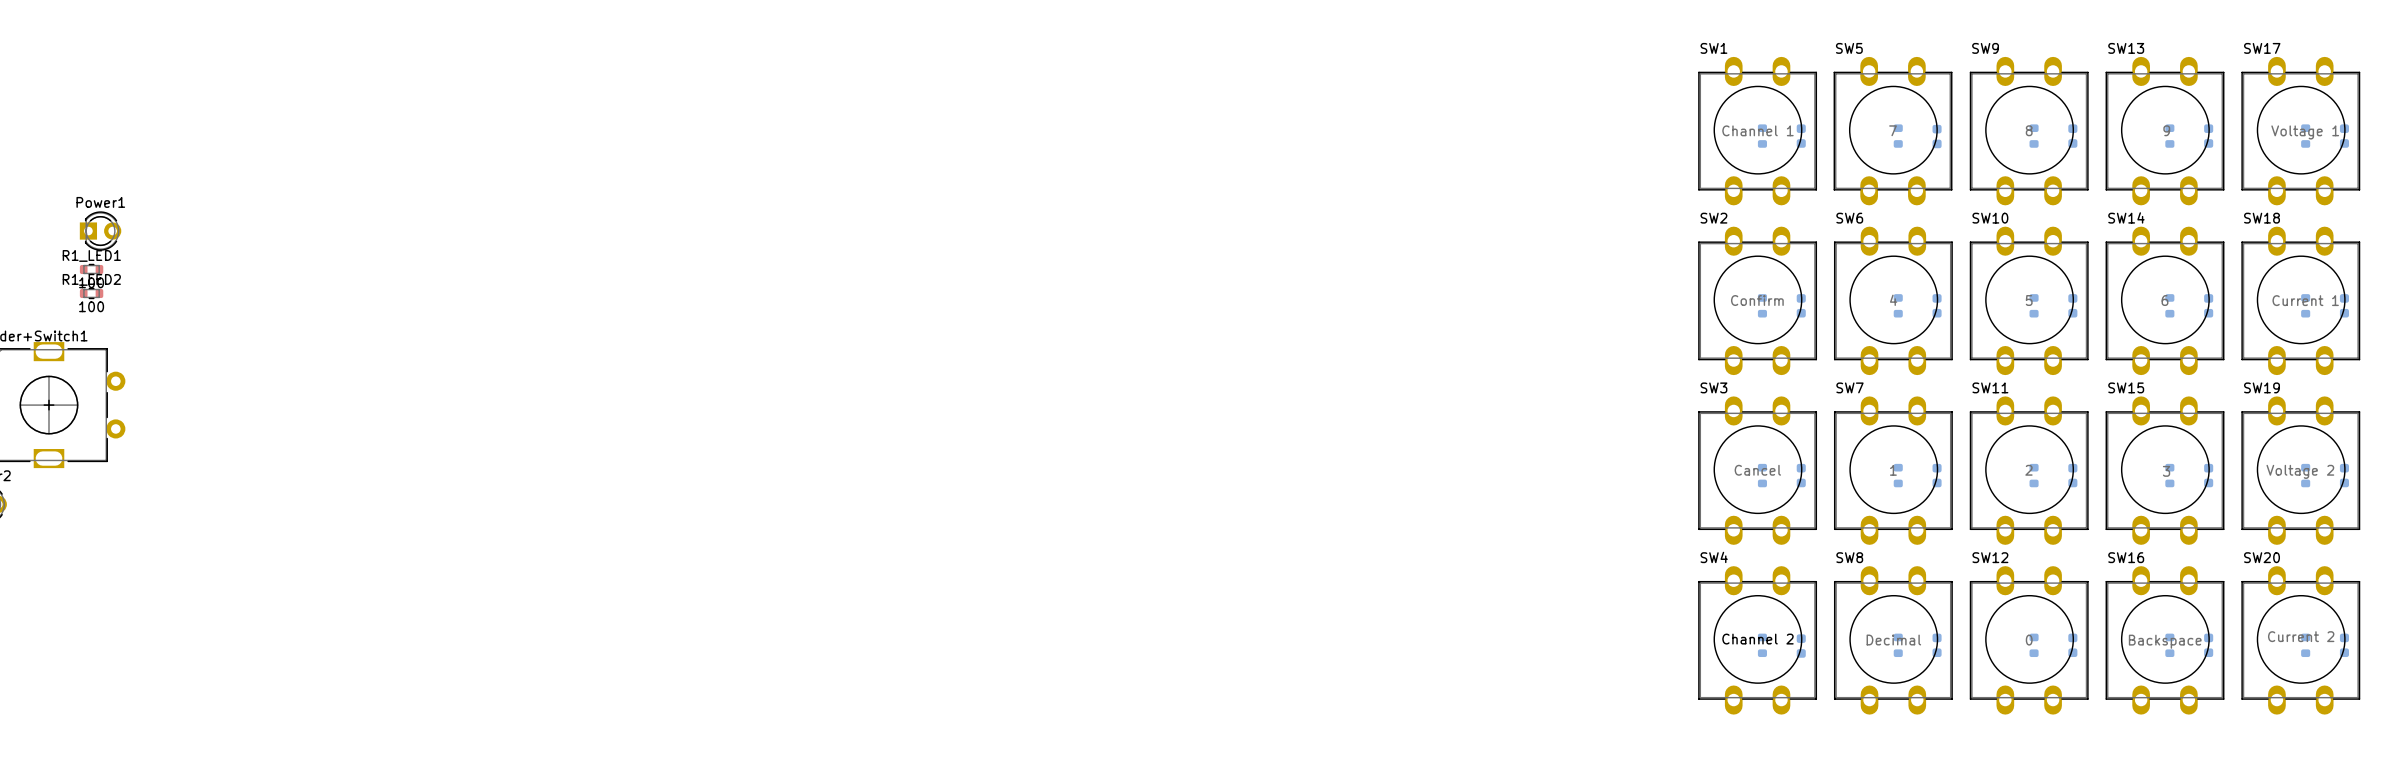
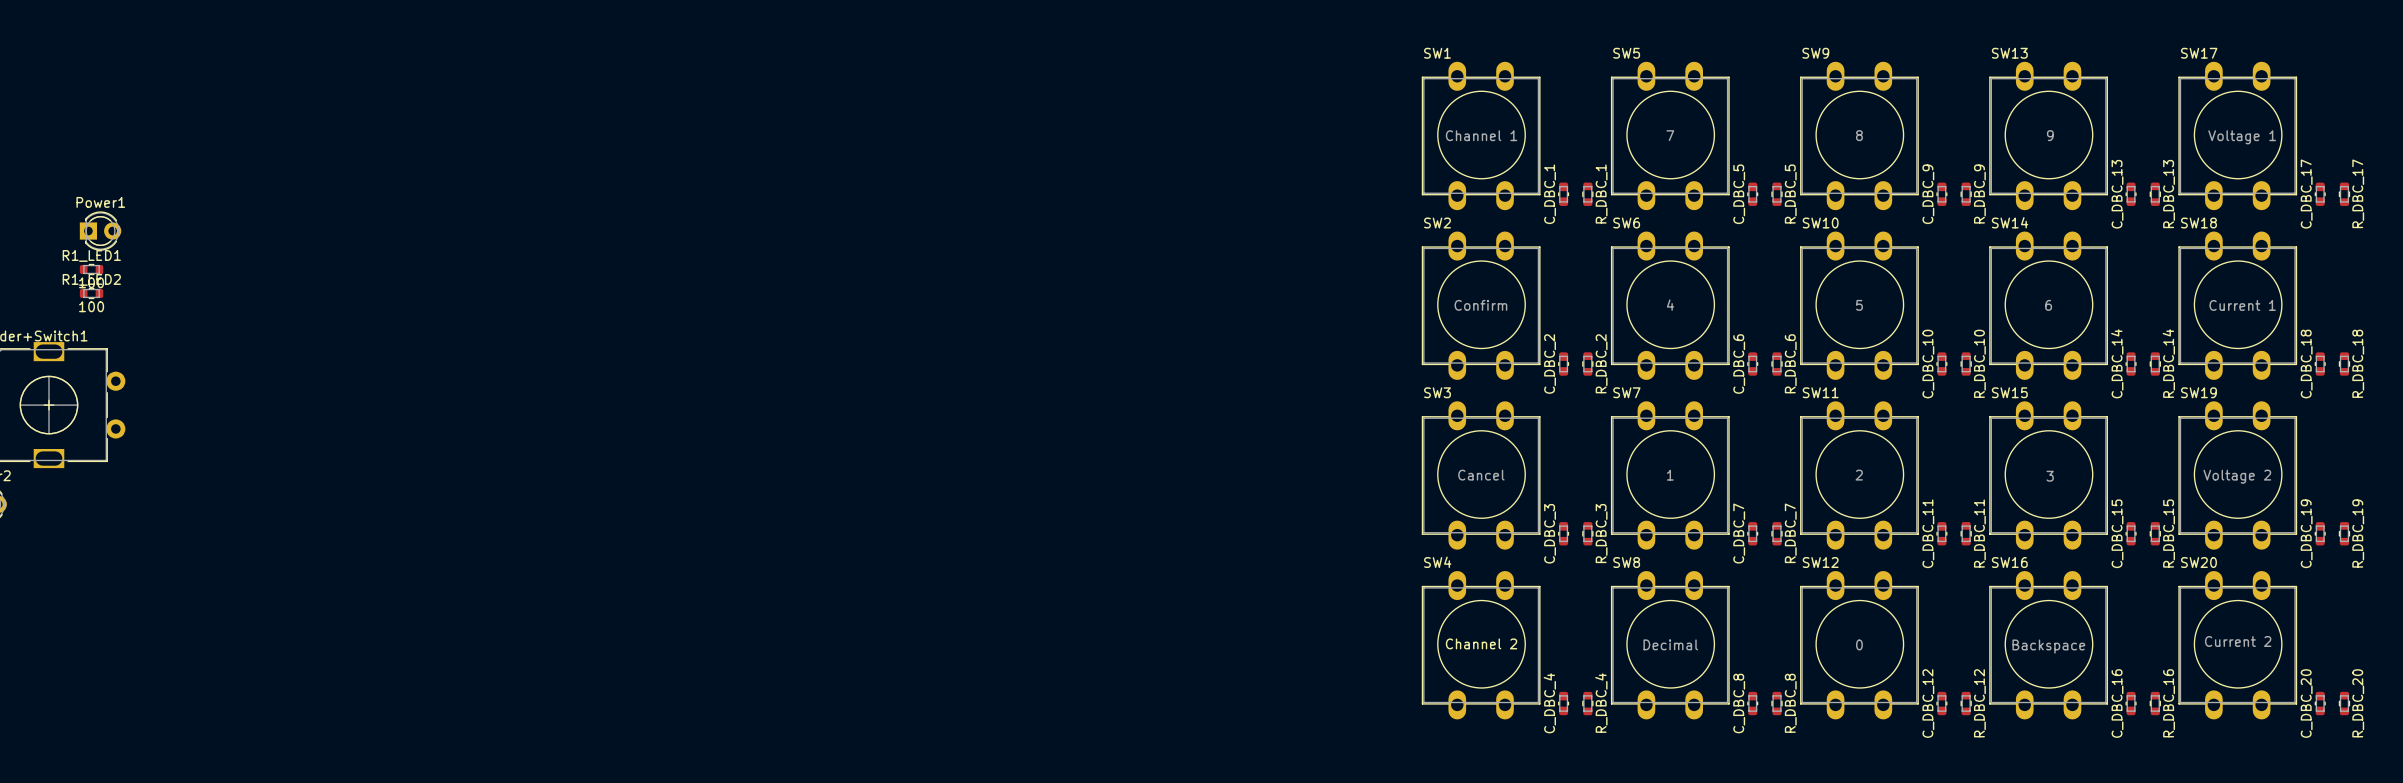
SW1 position: (1757, 131) -> (1481, 135)
SW5 position: (1893, 131) -> (1670, 135)
SW9 position: (2029, 131) -> (1859, 135)
SW13 position: (2165, 131) -> (2048, 135)
SW17 position: (2300, 131) -> (2237, 135)
R_DBC_1 side: bottom (1762, 136) -> top (1587, 194)
part: (1801, 136) -> none
R_DBC_5 side: bottom (1898, 136) -> top (1777, 194)
C_DBC_5 side: bottom (1937, 136) -> top (1752, 194)
R_DBC_9 side: bottom (2034, 136) -> top (1966, 194)
C_DBC_9 side: bottom (2072, 136) -> top (1941, 194)
R_DBC_13 side: bottom (2169, 136) -> top (2155, 194)
C_DBC_13 side: bottom (2208, 136) -> top (2131, 194)
R_DBC_17 side: bottom (2305, 136) -> top (2344, 194)
C_DBC_17 side: bottom (2344, 136) -> top (2320, 194)
C_DBC_1: none -> (1563, 194)
SW2 position: (1757, 300) -> (1481, 305)
SW6 position: (1893, 300) -> (1670, 305)
SW10 position: (2029, 300) -> (1859, 305)
SW14 position: (2165, 300) -> (2048, 305)
SW18 position: (2300, 300) -> (2237, 305)
R_DBC_2 side: bottom (1762, 305) -> top (1587, 364)
part: (1801, 305) -> none
R_DBC_6 side: bottom (1898, 305) -> top (1777, 364)
C_DBC_6 side: bottom (1937, 305) -> top (1752, 364)
R_DBC_10 side: bottom (2034, 305) -> top (1966, 364)
C_DBC_10 side: bottom (2072, 305) -> top (1941, 364)
R_DBC_14 side: bottom (2169, 305) -> top (2155, 364)
C_DBC_14 side: bottom (2208, 305) -> top (2131, 364)
R_DBC_18 side: bottom (2305, 305) -> top (2344, 364)
C_DBC_18 side: bottom (2344, 305) -> top (2320, 364)
C_DBC_2: none -> (1563, 364)
SW3 position: (1757, 470) -> (1481, 475)
SW7 position: (1893, 470) -> (1670, 475)
SW11 position: (2029, 470) -> (1859, 475)
SW15 position: (2165, 470) -> (2048, 475)
SW19 position: (2300, 470) -> (2237, 475)
R_DBC_3 side: bottom (1762, 475) -> top (1587, 533)
part: (1801, 475) -> none
R_DBC_7 side: bottom (1898, 475) -> top (1777, 533)
C_DBC_7 side: bottom (1937, 475) -> top (1752, 533)
R_DBC_11 side: bottom (2034, 475) -> top (1966, 533)
C_DBC_11 side: bottom (2072, 475) -> top (1941, 533)
R_DBC_15 side: bottom (2169, 475) -> top (2155, 533)
C_DBC_15 side: bottom (2208, 475) -> top (2131, 533)
R_DBC_19 side: bottom (2305, 475) -> top (2344, 533)
C_DBC_19 side: bottom (2344, 475) -> top (2320, 533)
C_DBC_3: none -> (1563, 533)
SW4 position: (1757, 640) -> (1481, 645)
SW8 position: (1893, 640) -> (1670, 645)
SW12 position: (2029, 640) -> (1859, 645)
SW16 position: (2165, 640) -> (2048, 645)
SW20 position: (2300, 640) -> (2237, 645)
R_DBC_4 side: bottom (1762, 645) -> top (1587, 703)
R_DBC_8 side: bottom (1898, 645) -> top (1777, 703)
C_DBC_8 side: bottom (1937, 645) -> top (1752, 703)
R_DBC_12 side: bottom (2034, 645) -> top (1966, 703)
C_DBC_12 side: bottom (2072, 645) -> top (1941, 703)
R_DBC_16 side: bottom (2169, 645) -> top (2155, 703)
C_DBC_16 side: bottom (2208, 645) -> top (2131, 703)
R_DBC_20 side: bottom (2305, 645) -> top (2344, 703)
C_DBC_20 side: bottom (2344, 645) -> top (2320, 703)
part: (1801, 646) -> none
C_DBC_4: none -> (1563, 703)

